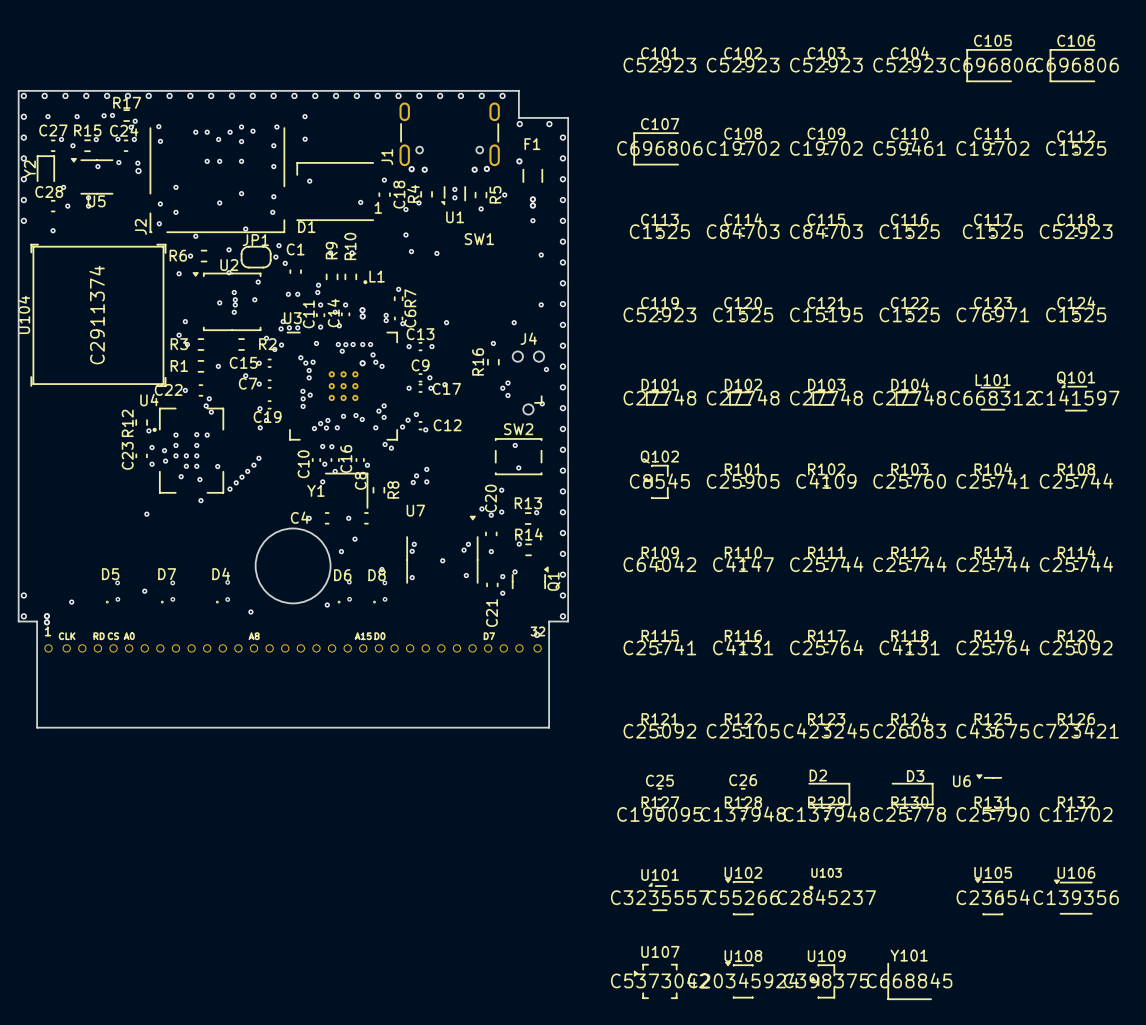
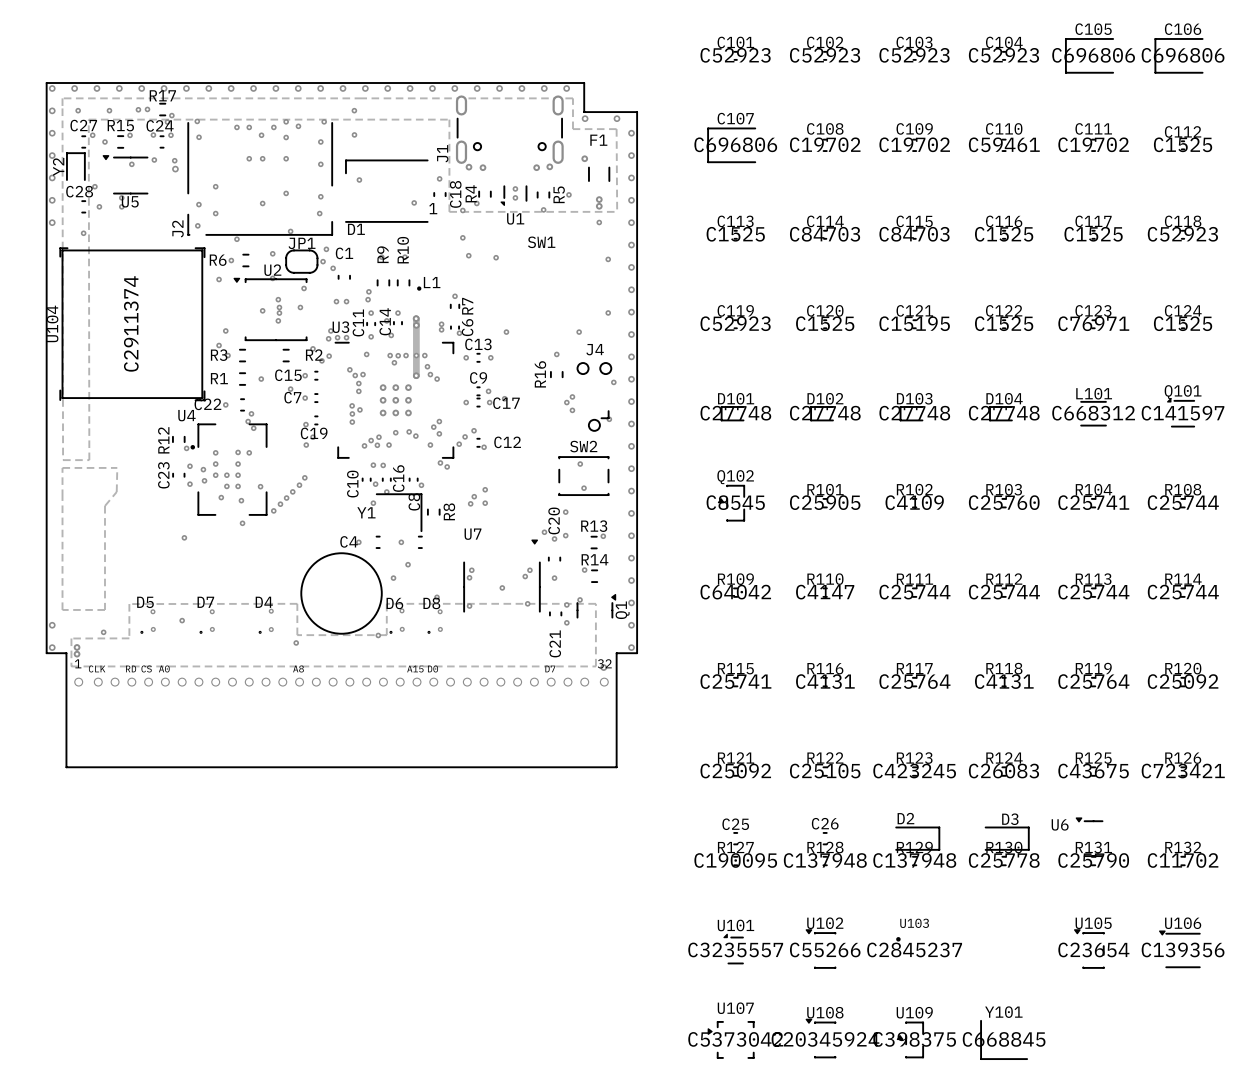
zone outline: none -> (62, 98) (63, 460) (89, 460) (88, 119) (449, 119) (449, 211) (617, 211) (616, 129) (572, 129) (572, 98) (62, 98)
track: none -> (416, 318) (416, 375)
zone outline: none -> (62, 467) (62, 609) (105, 609) (105, 505) (116, 492) (117, 467) (62, 467)
zone outline: none -> (297, 603) (297, 635) (386, 635) (386, 603) (595, 603) (595, 666) (71, 666) (71, 638) (129, 638) (129, 604) (297, 603)

